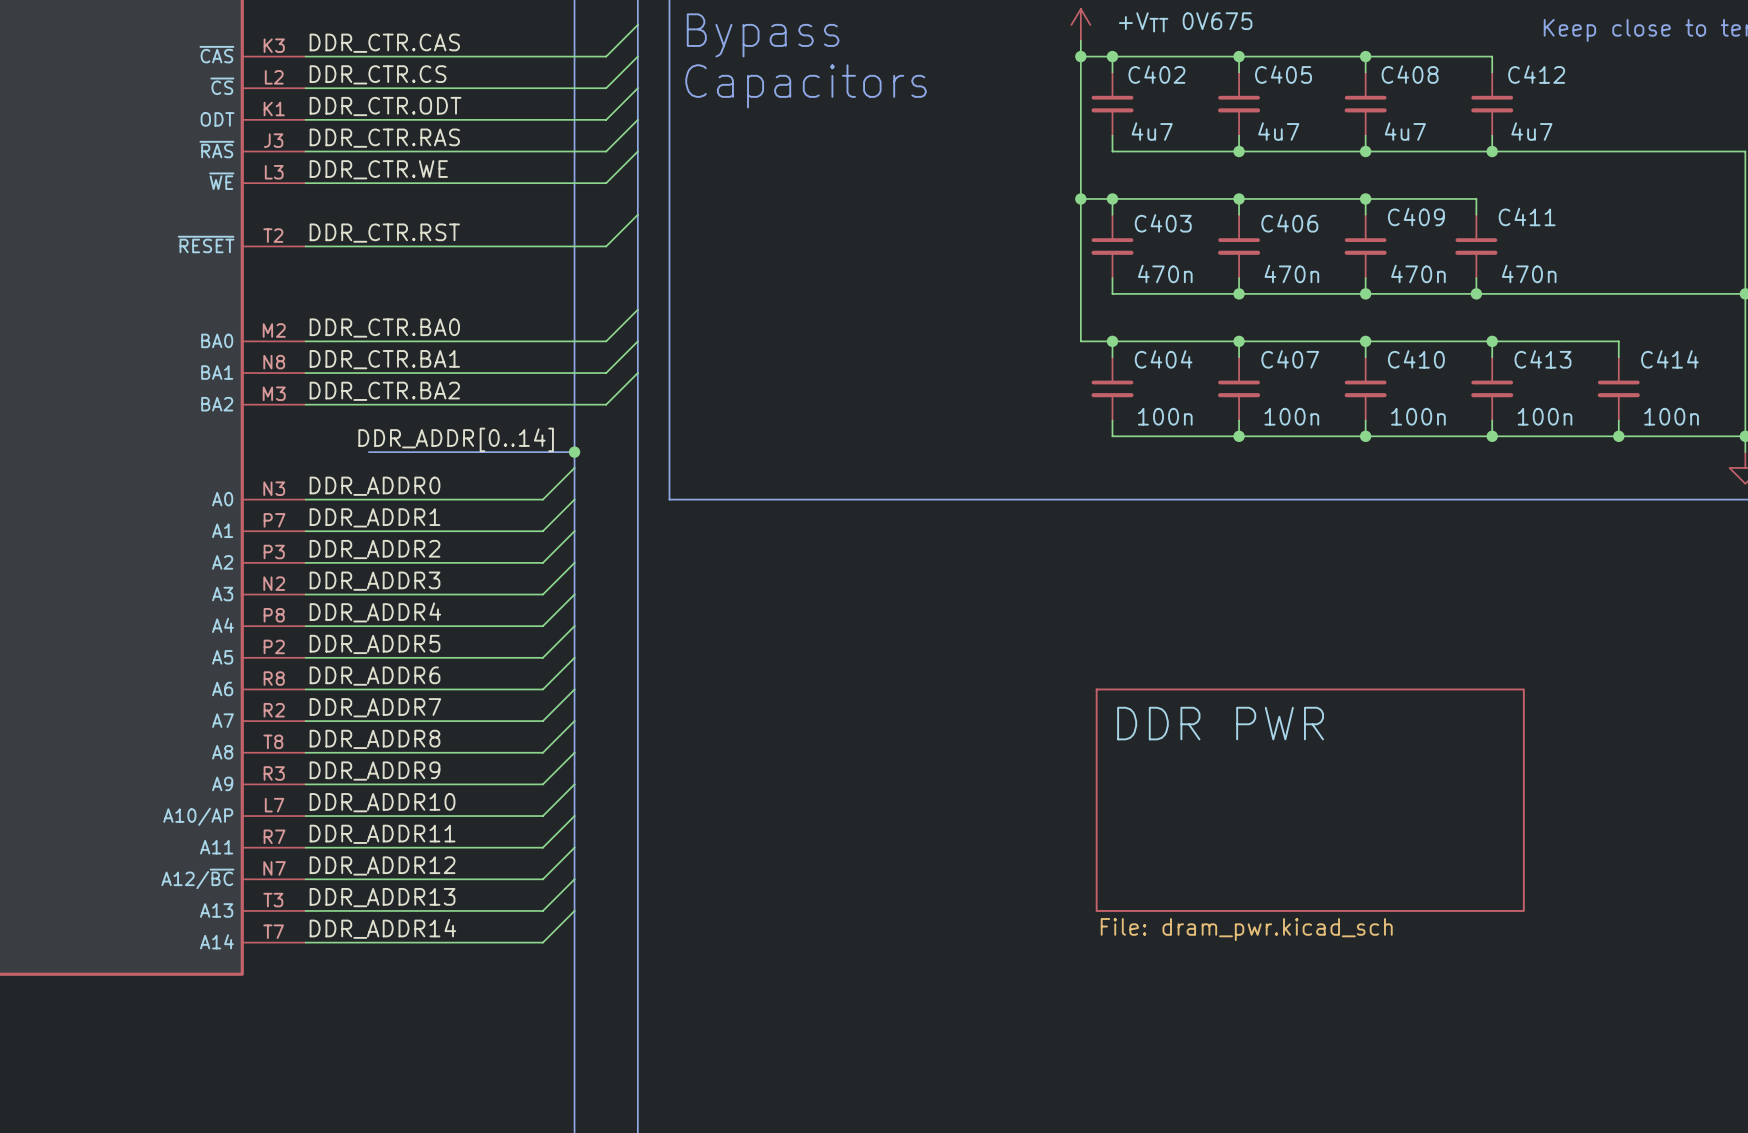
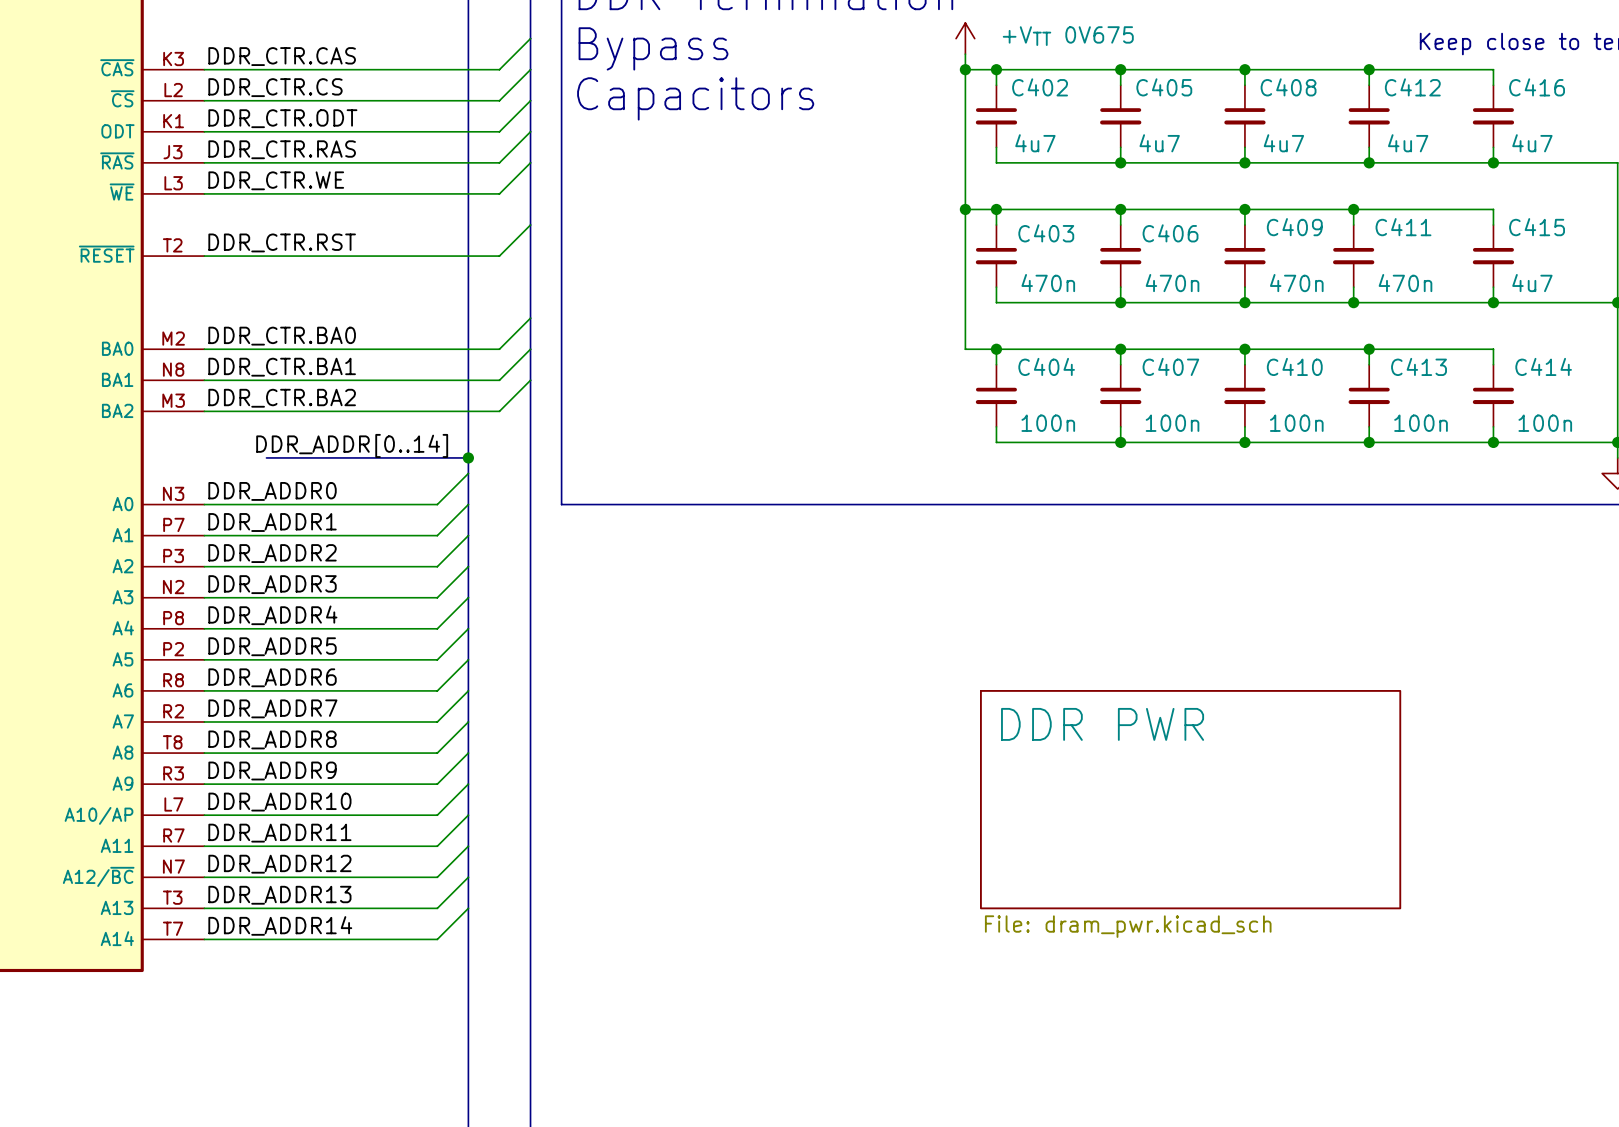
wire: none -> (1369, 69) (1493, 69) (1493, 85)
junction: none -> (1369, 69)
C416: none -> 4u7 (1493, 116)
wire: none -> (1493, 147) (1493, 162)
junction: none -> (1493, 162)
wire: none -> (1353, 209) (1493, 209) (1493, 224)
junction: none -> (1353, 209)
C415: none -> 4u7 (1493, 256)
wire: none -> (1493, 287) (1493, 302)
junction: none -> (1493, 302)

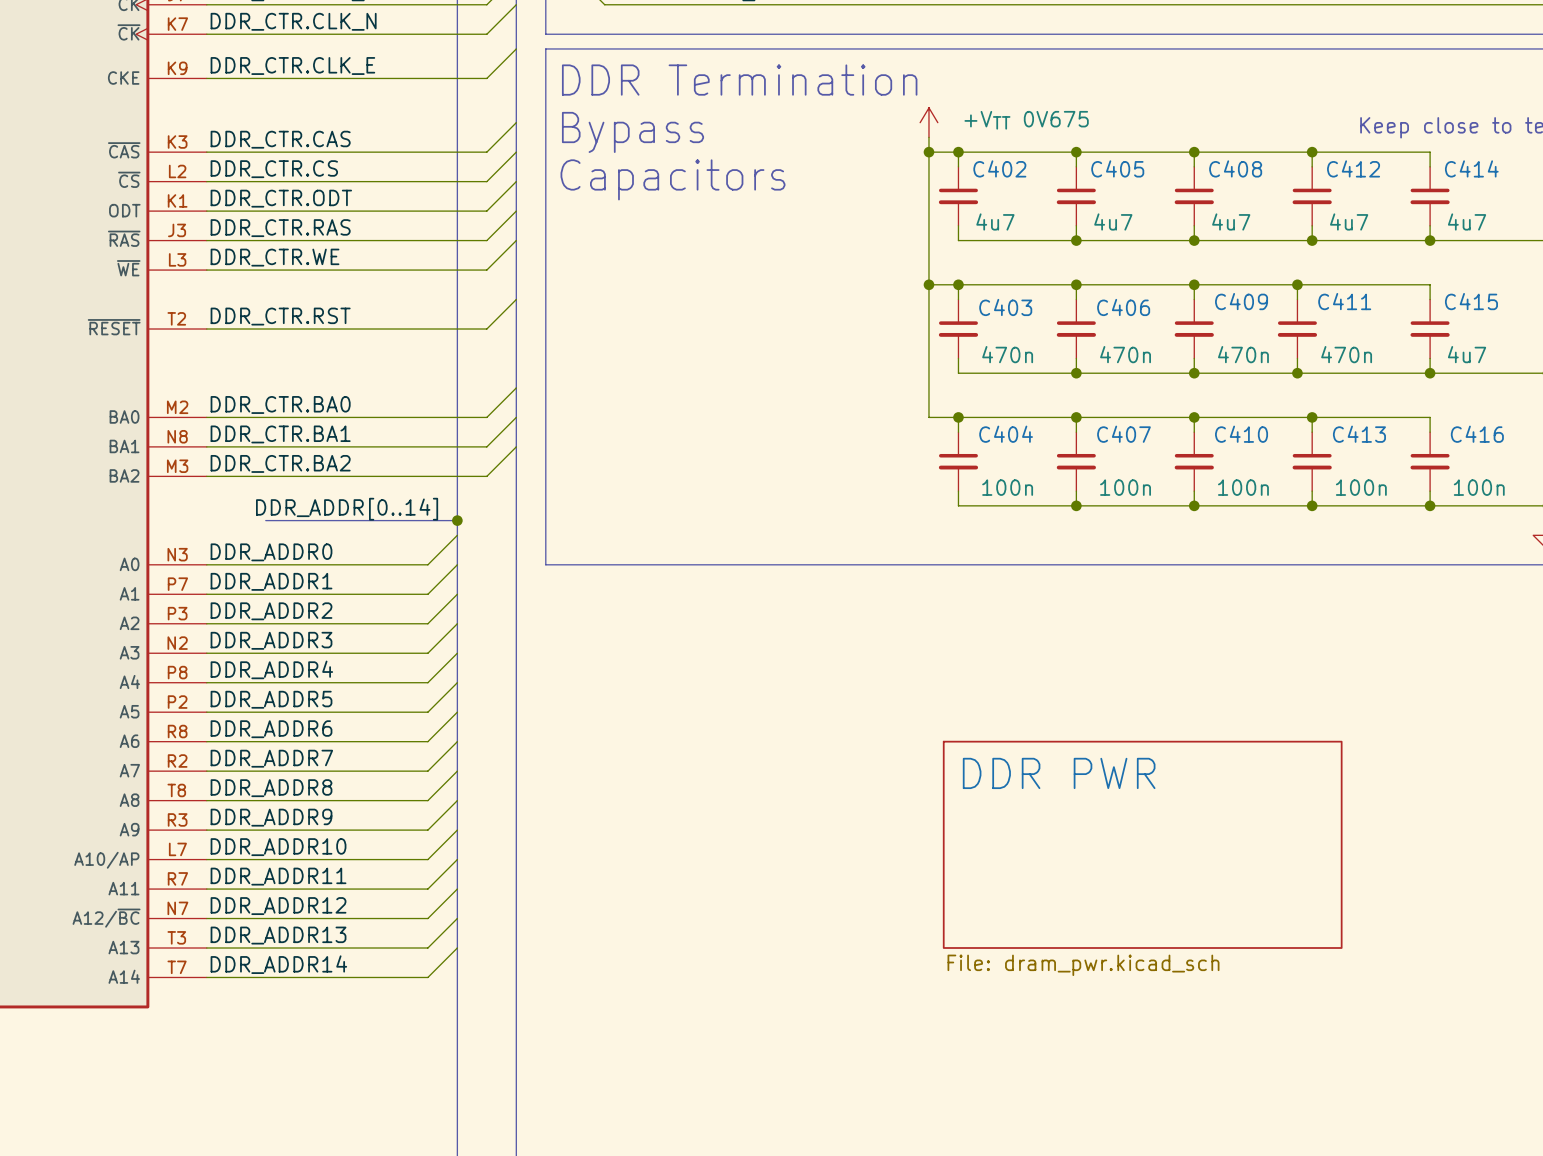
C416 name: C416 (1537, 87) -> C414 (1471, 168)
C414 name: C414 (1543, 366) -> C416 (1477, 434)

